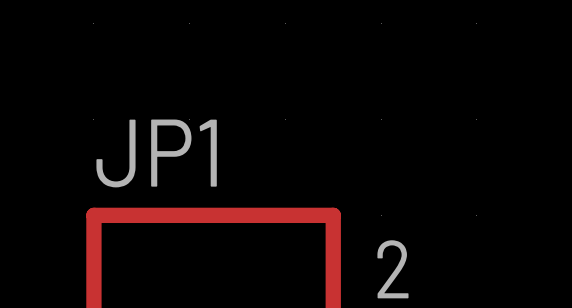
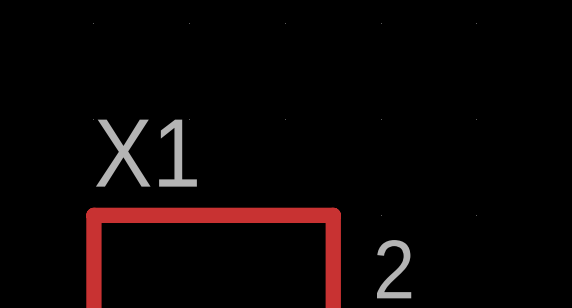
JP1 name: JP1 (156, 153) -> X1 (146, 153)

